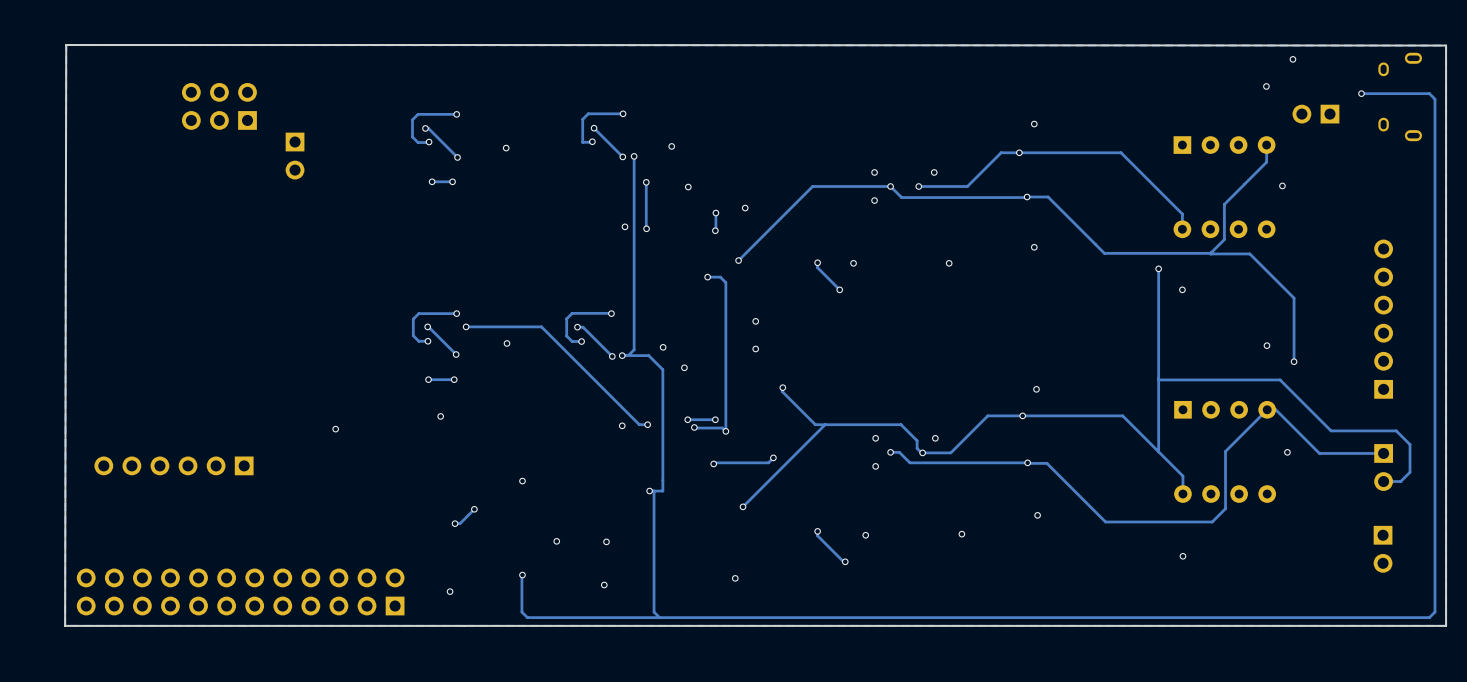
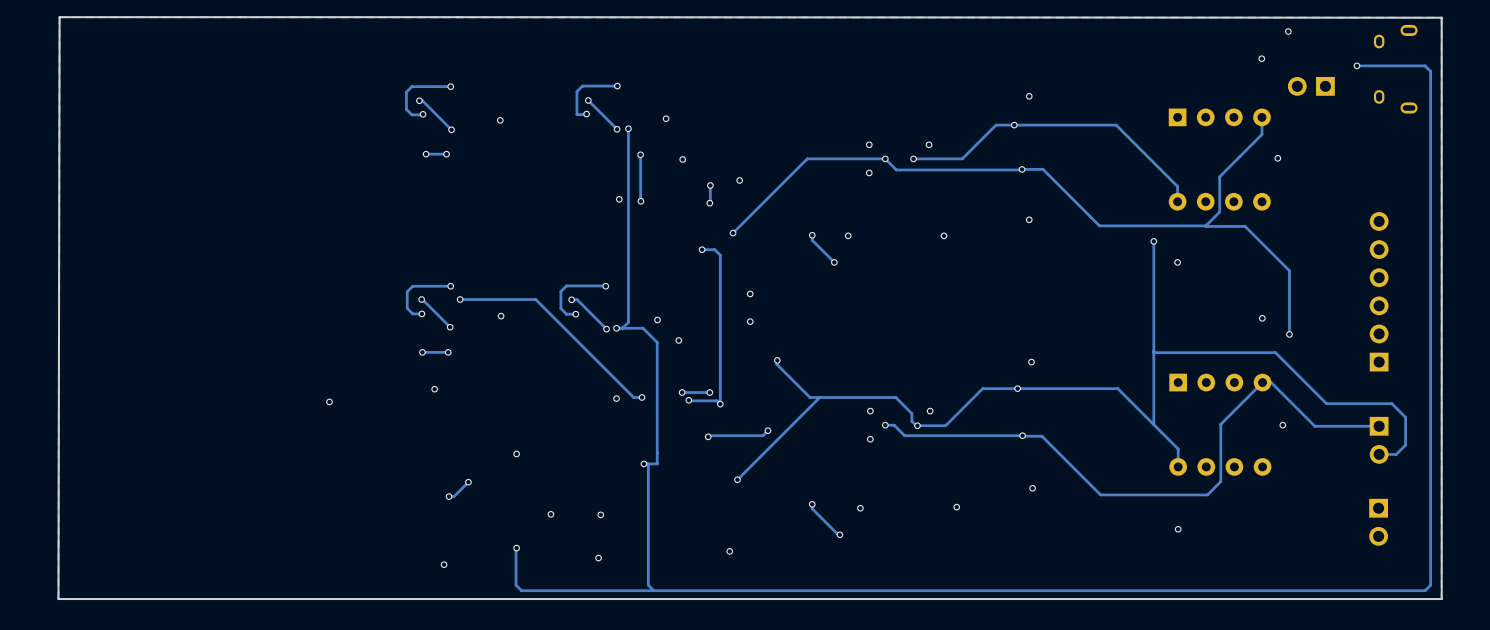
part: (219, 106) -> none
part: (295, 156) -> none
part: (174, 465) -> none
part: (240, 591) -> none

